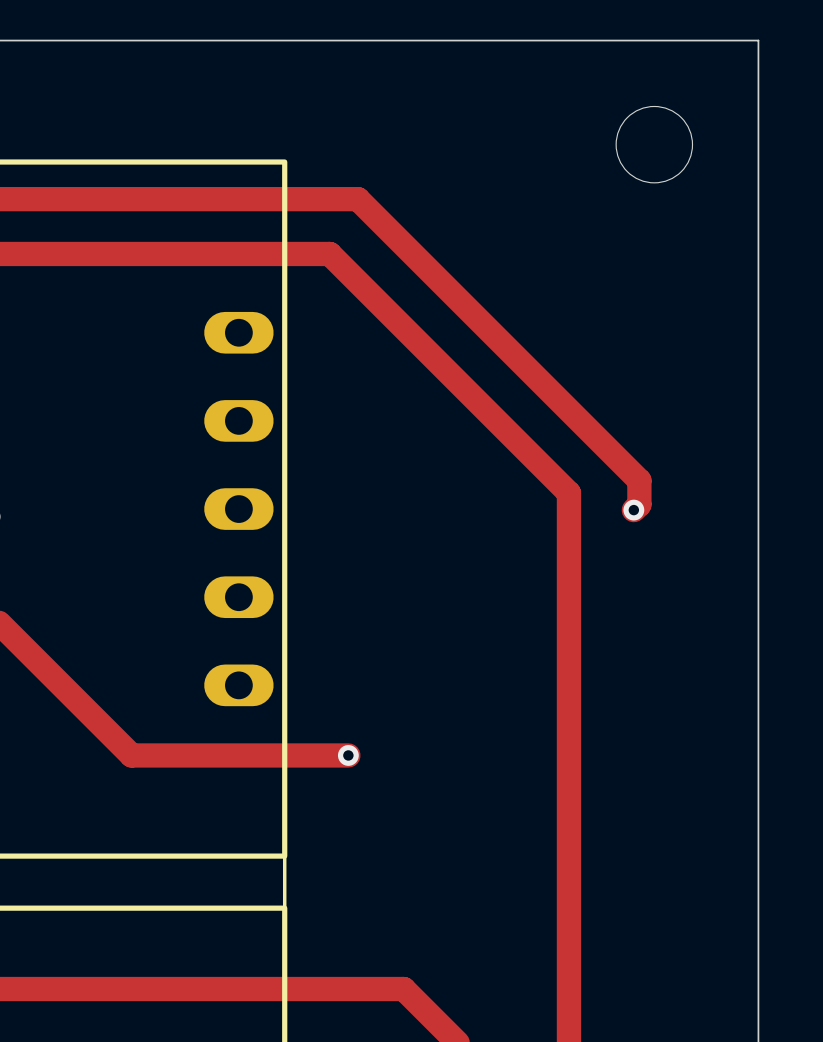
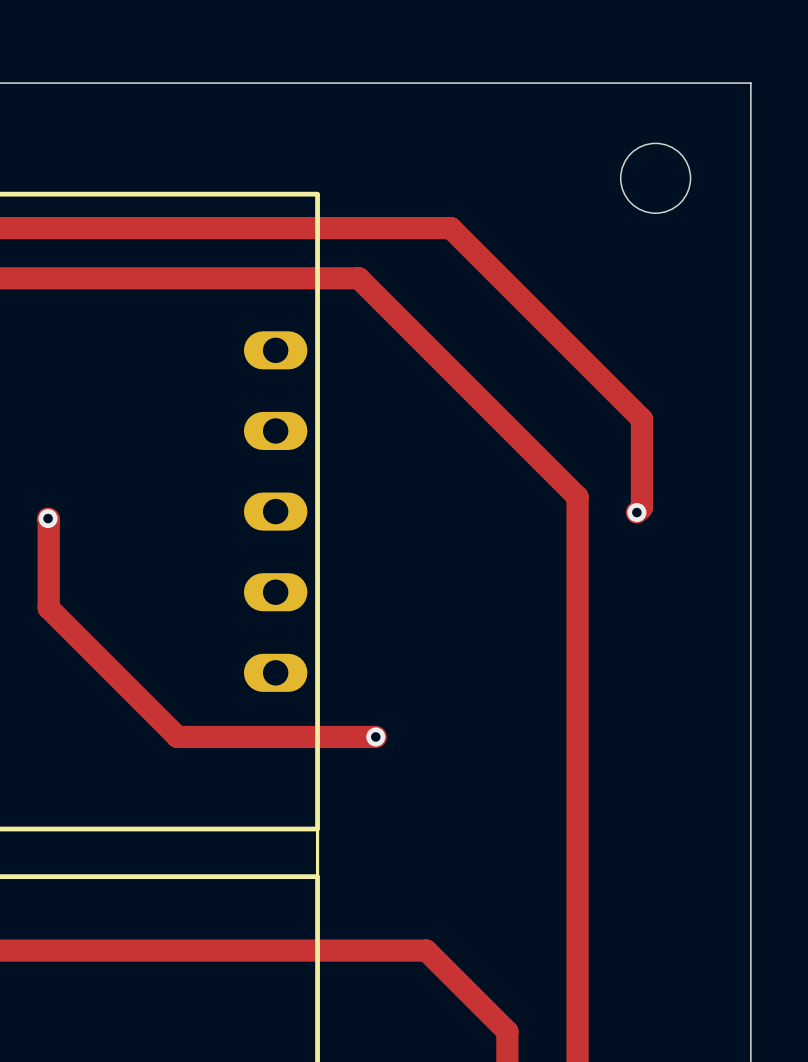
track: (357, 199) (639, 480) -> (384, 228) (450, 228) (641, 419) (641, 485)

